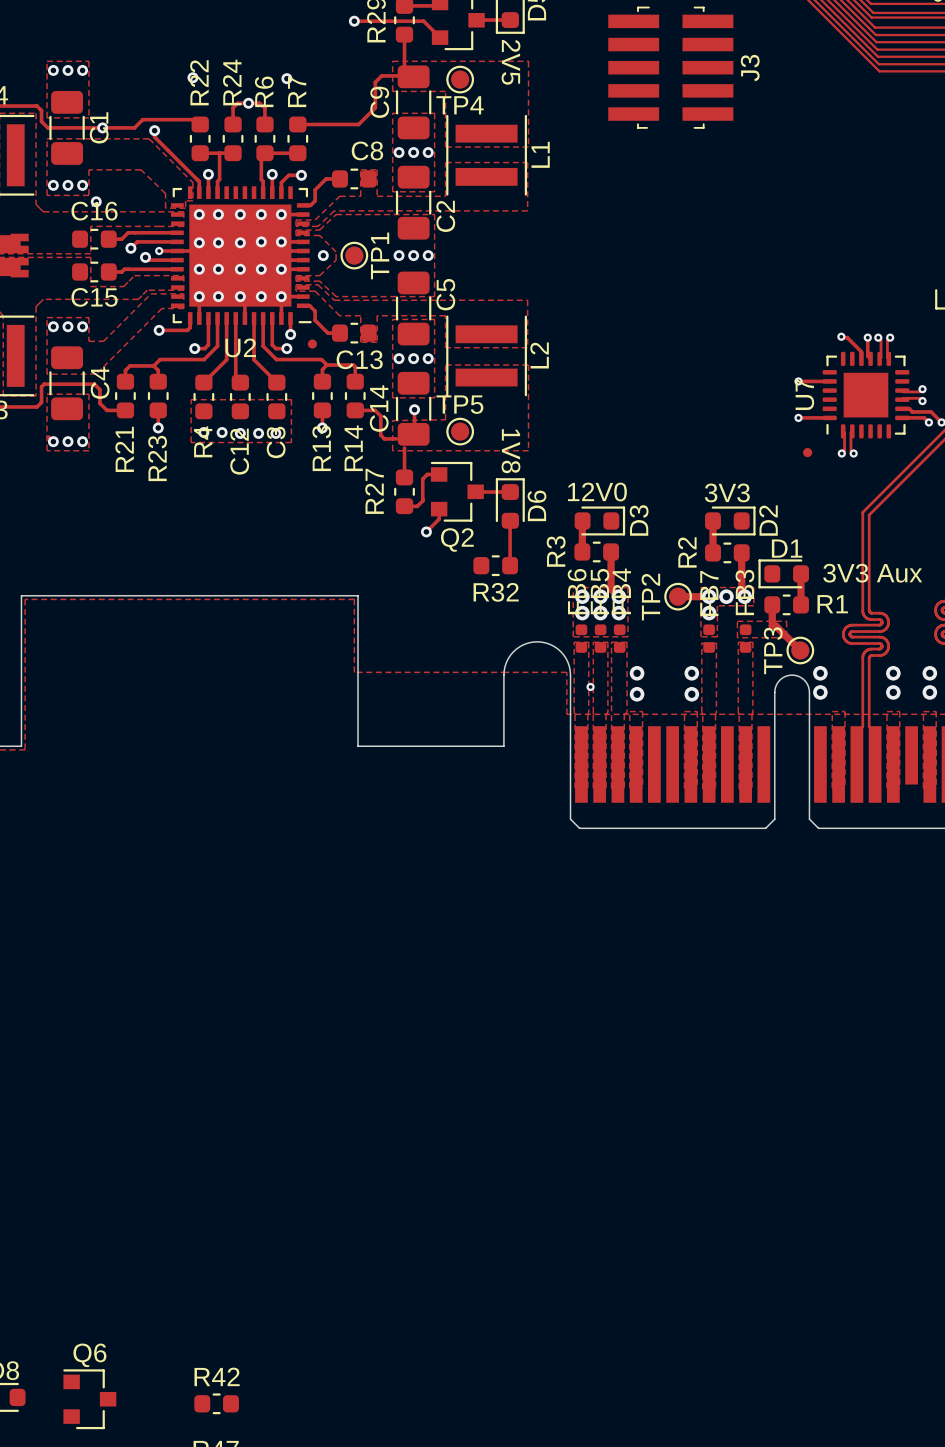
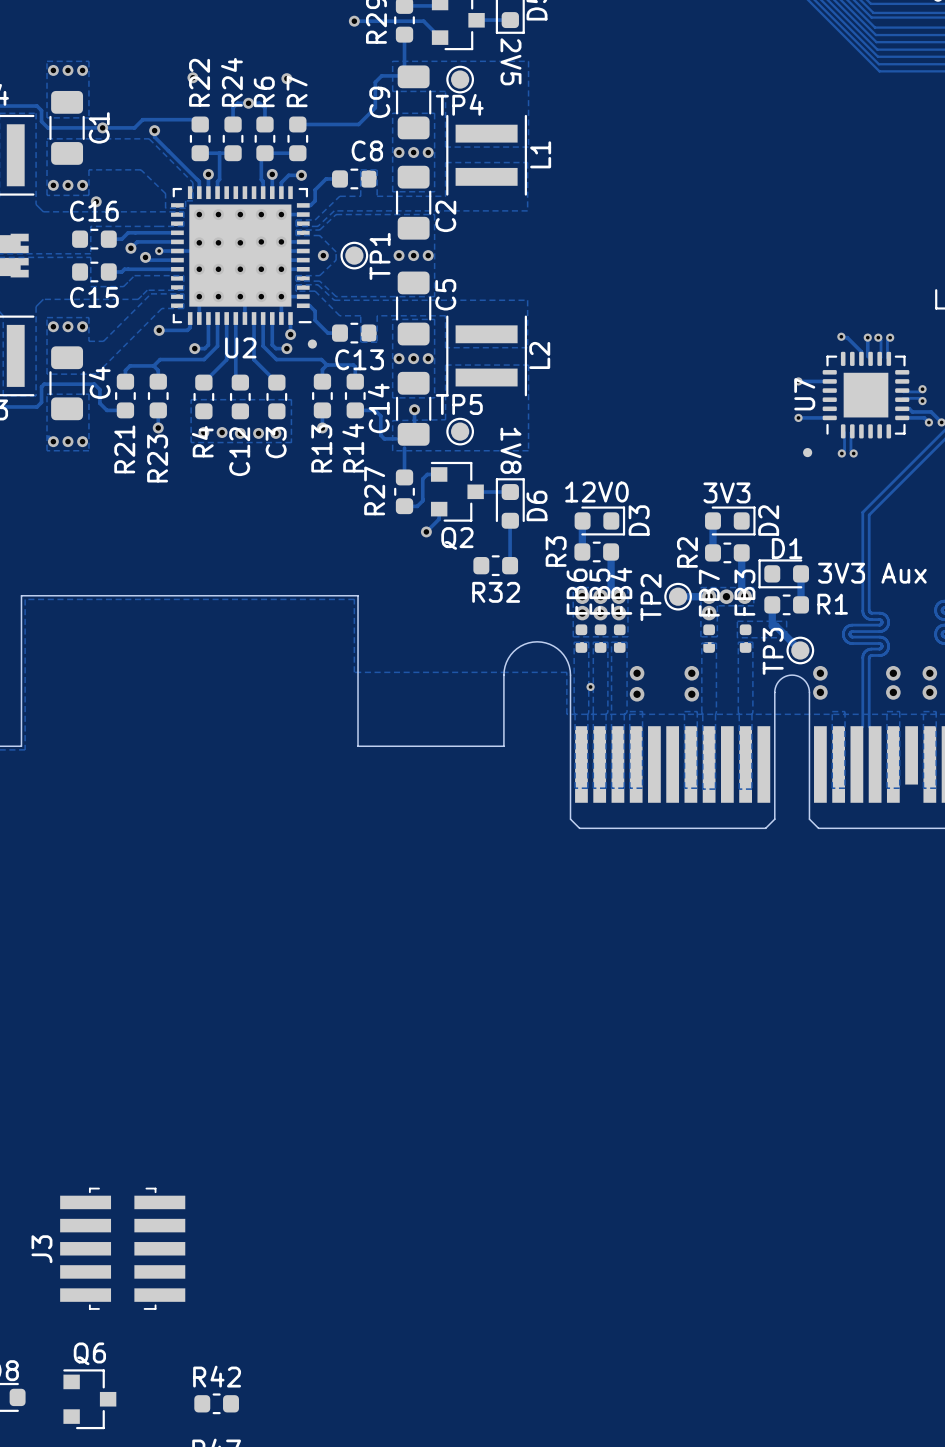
J3 rotation: 0° (670, 67) -> 180° (122, 1248)
J3 position: (670, 67) -> (122, 1248)

